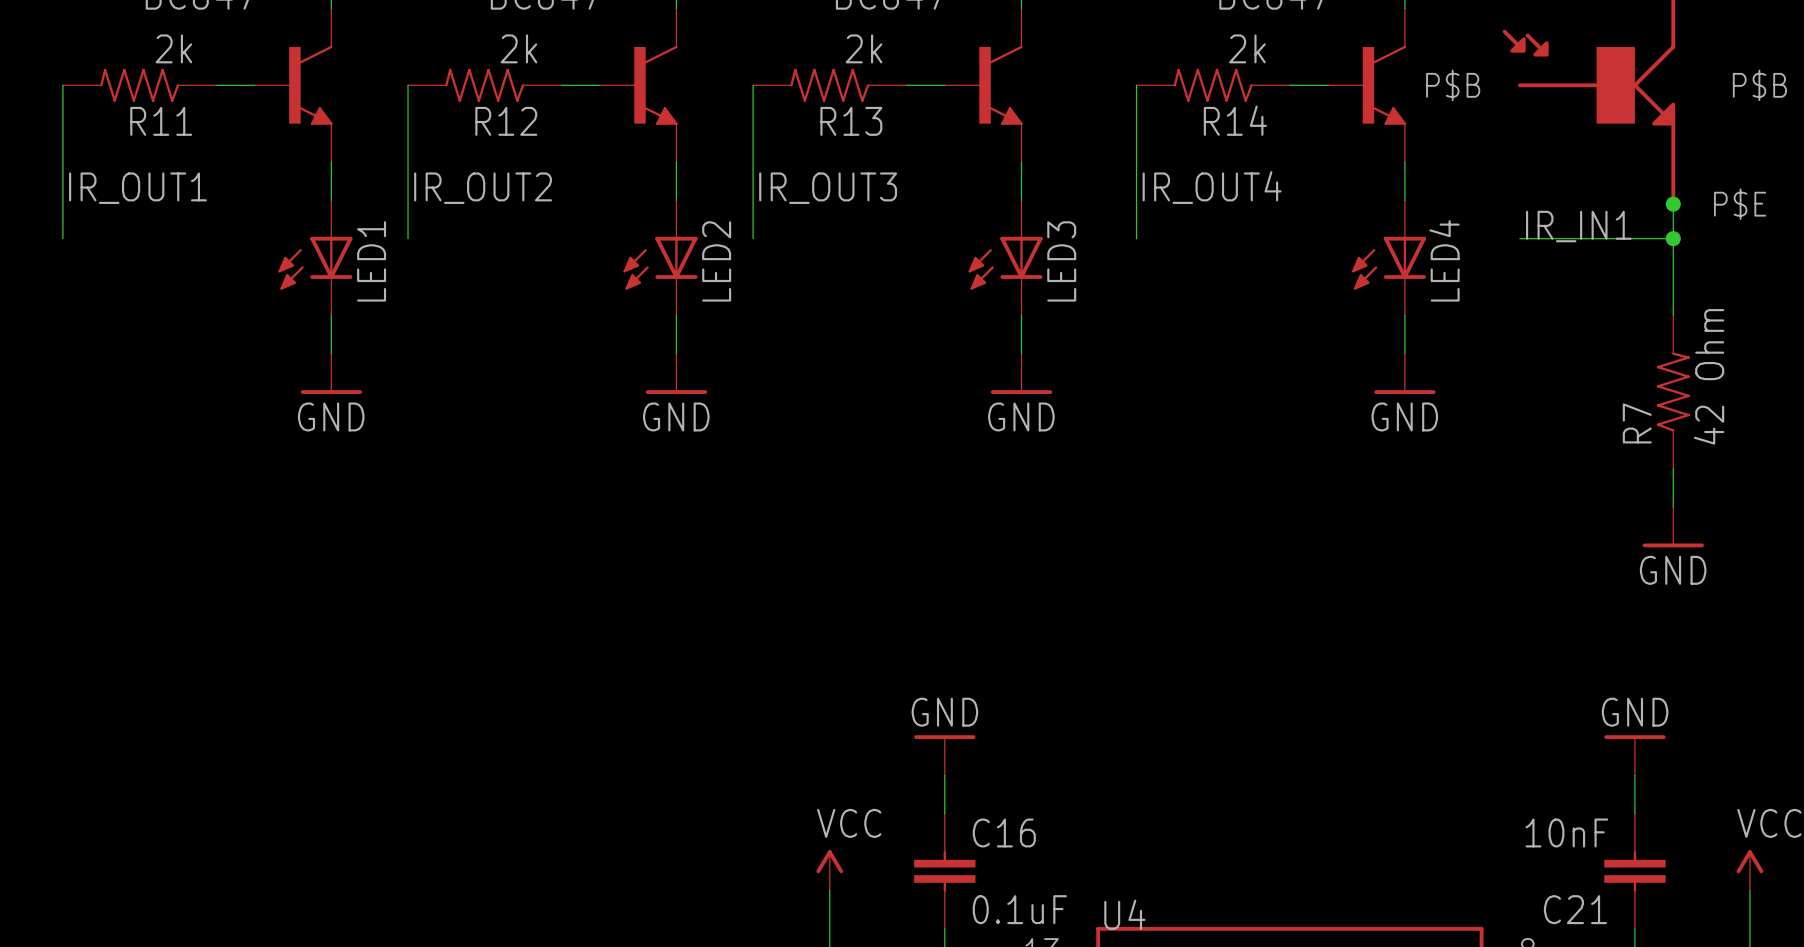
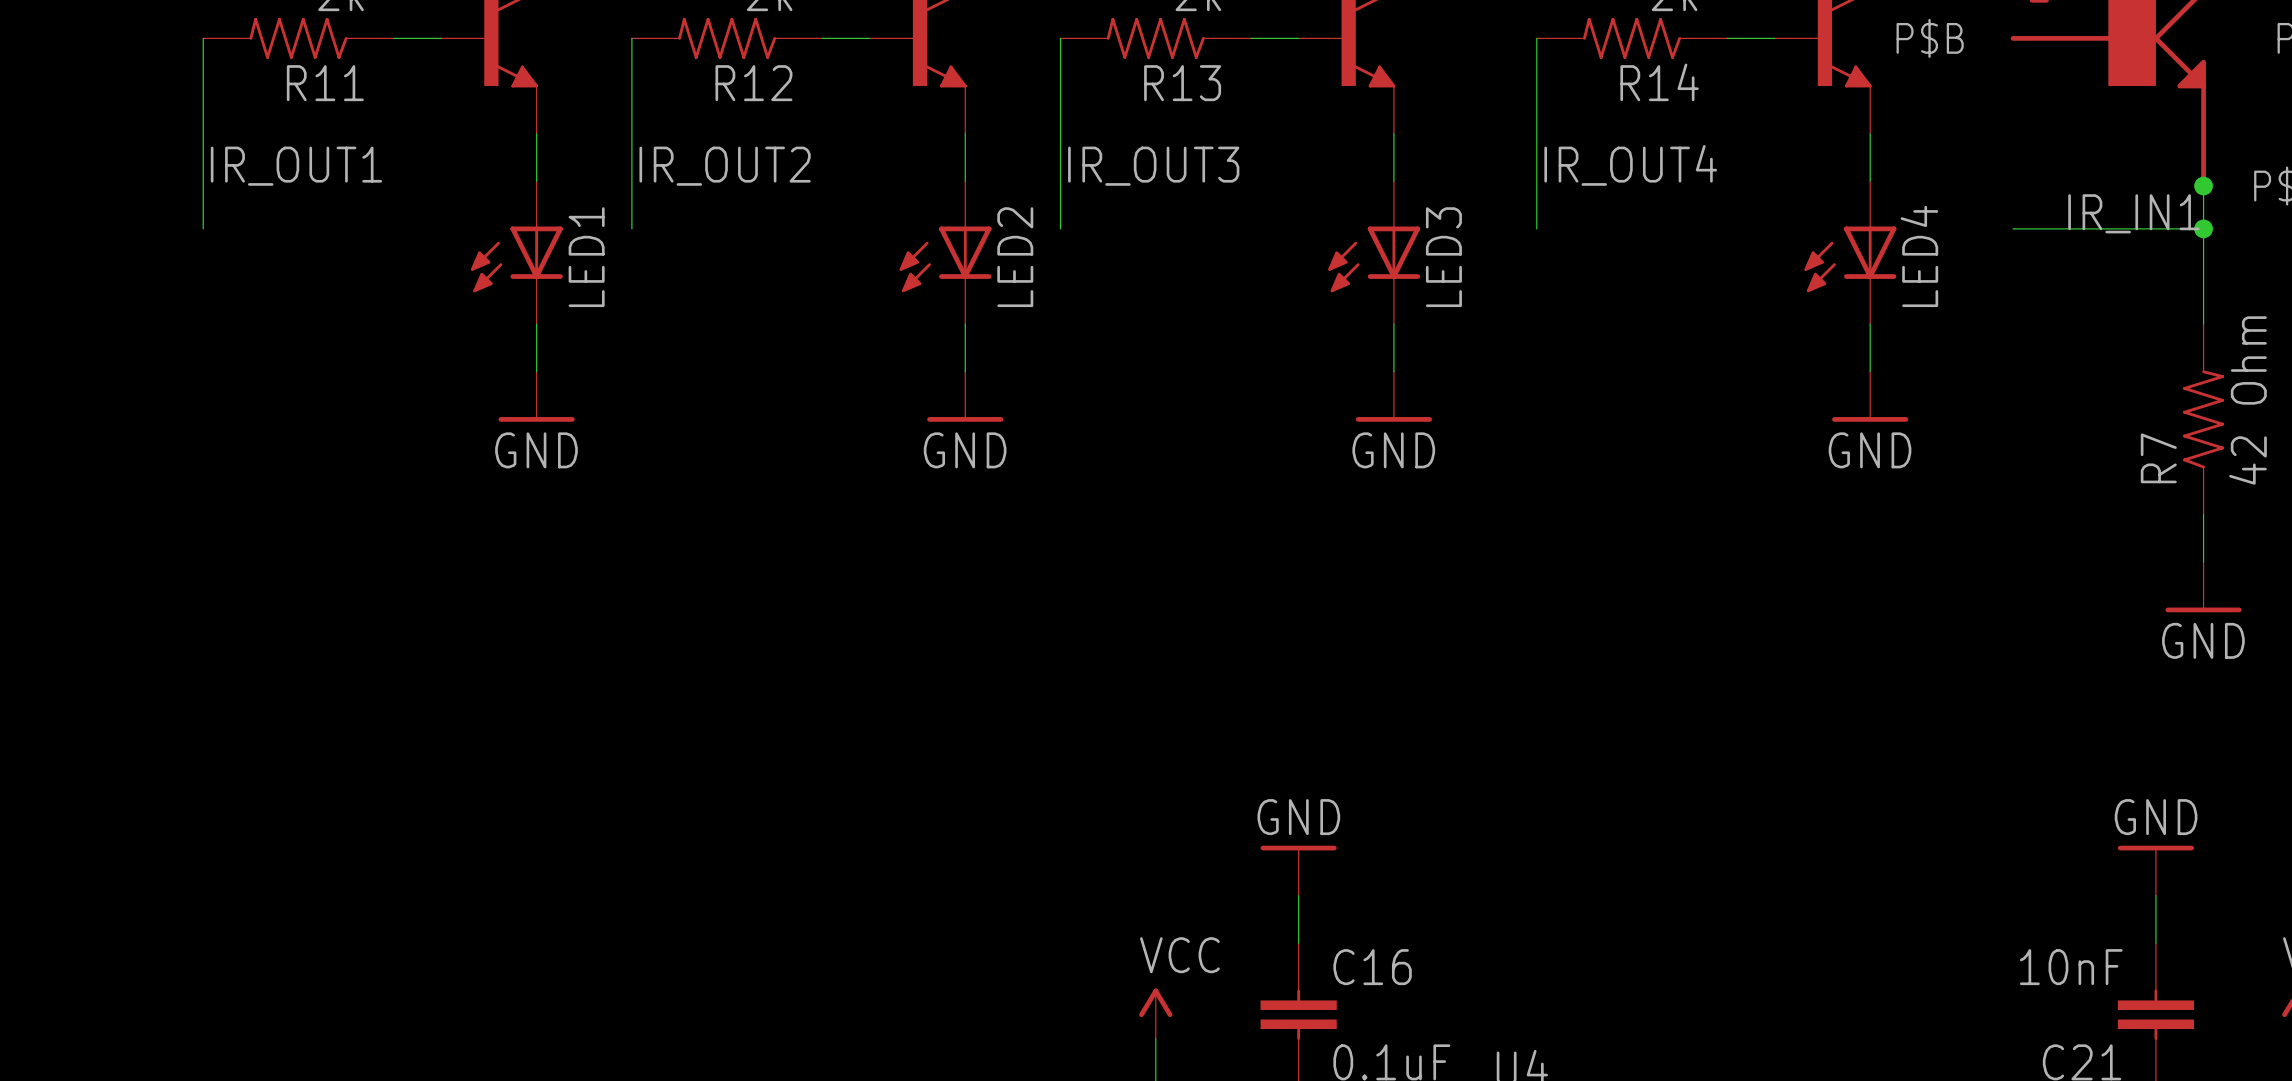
label position: IR_IN1 (1578, 226) -> IR_IN1 (2133, 213)

